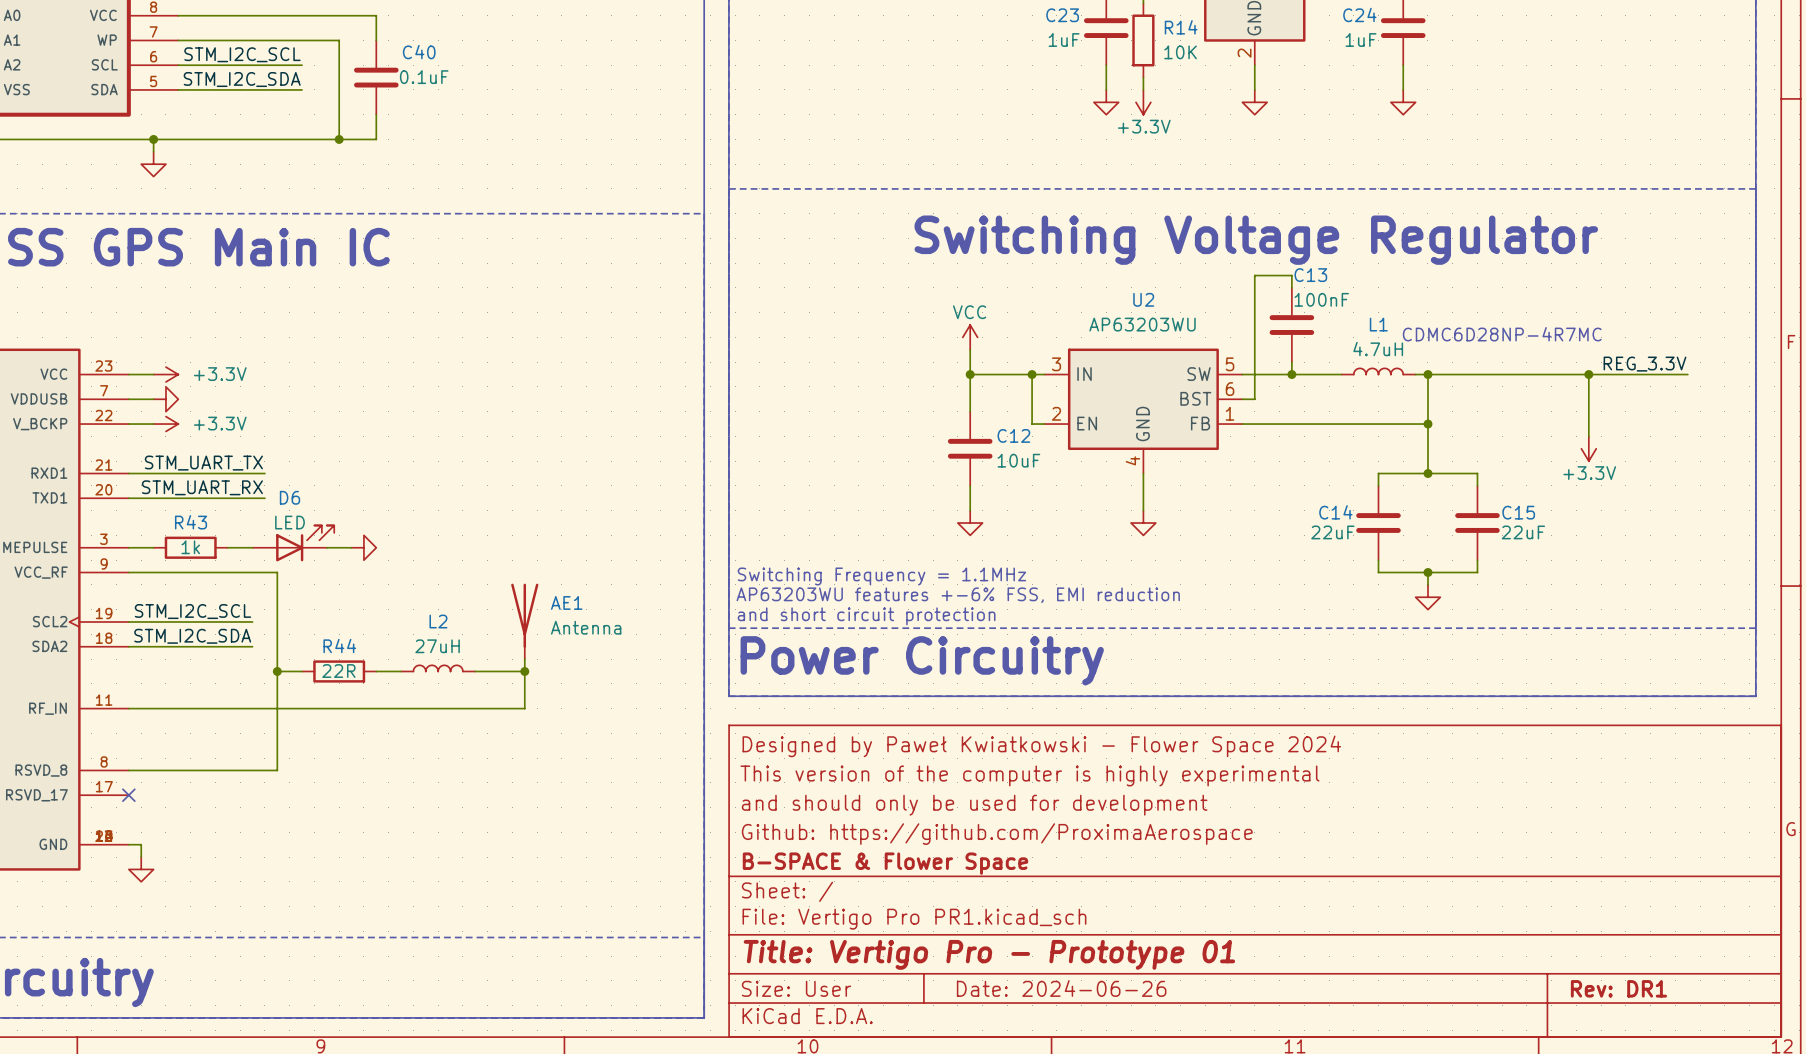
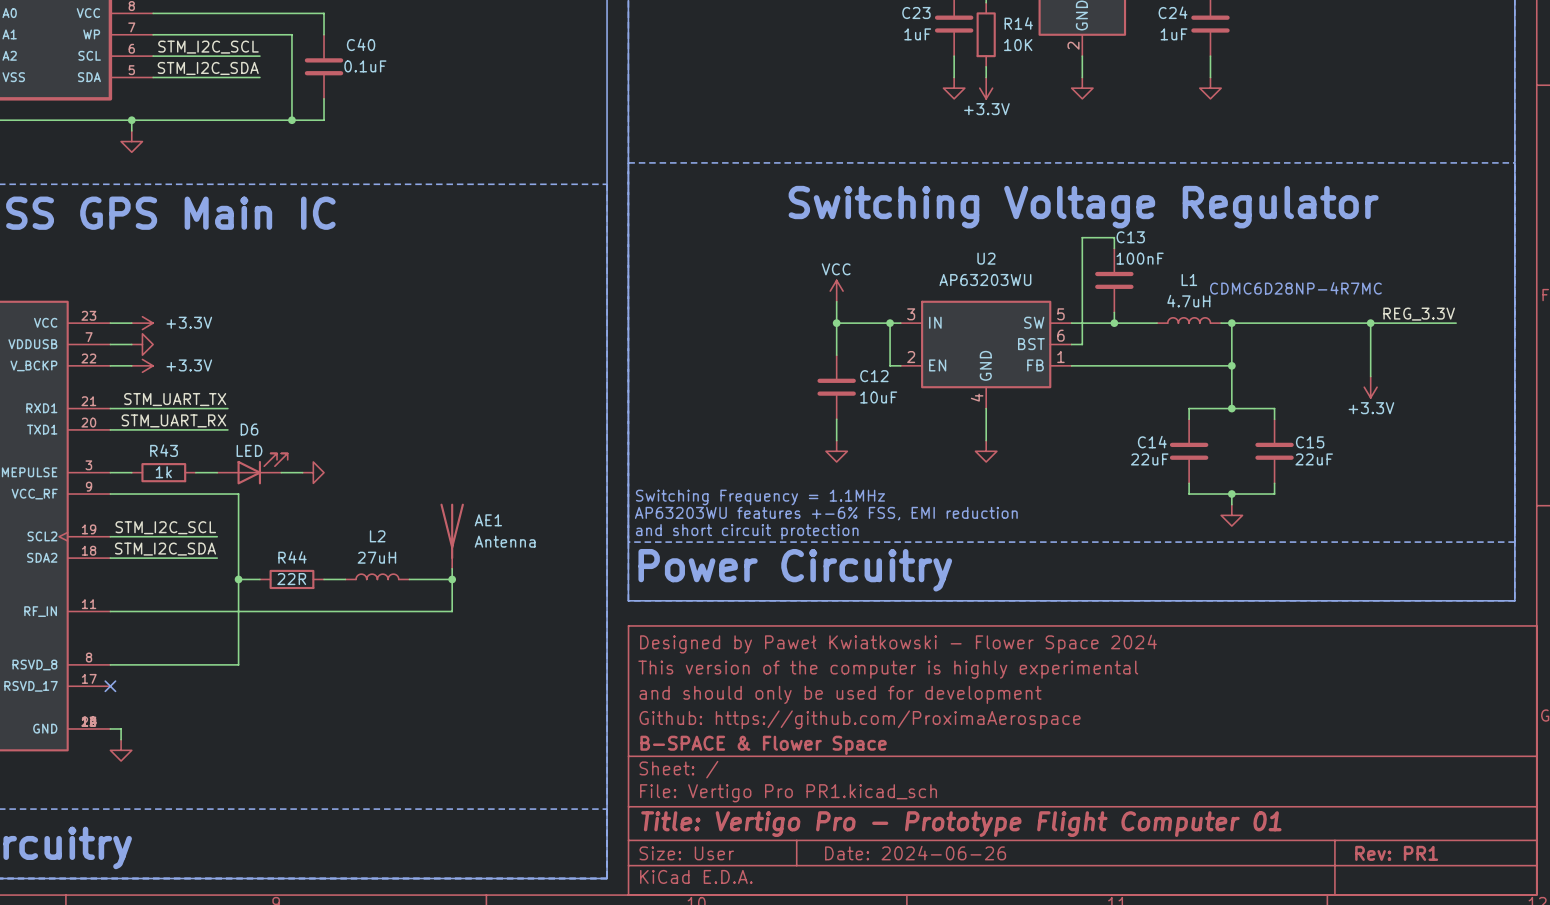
title block: Title: Vertigo Pro - Prototype 01 (989, 954) -> Title: Vertigo Pro - Prototype Flight Computer 01 (961, 824)
title block: Rev: DR1 (1618, 988) -> Rev: PR1 (1396, 853)

